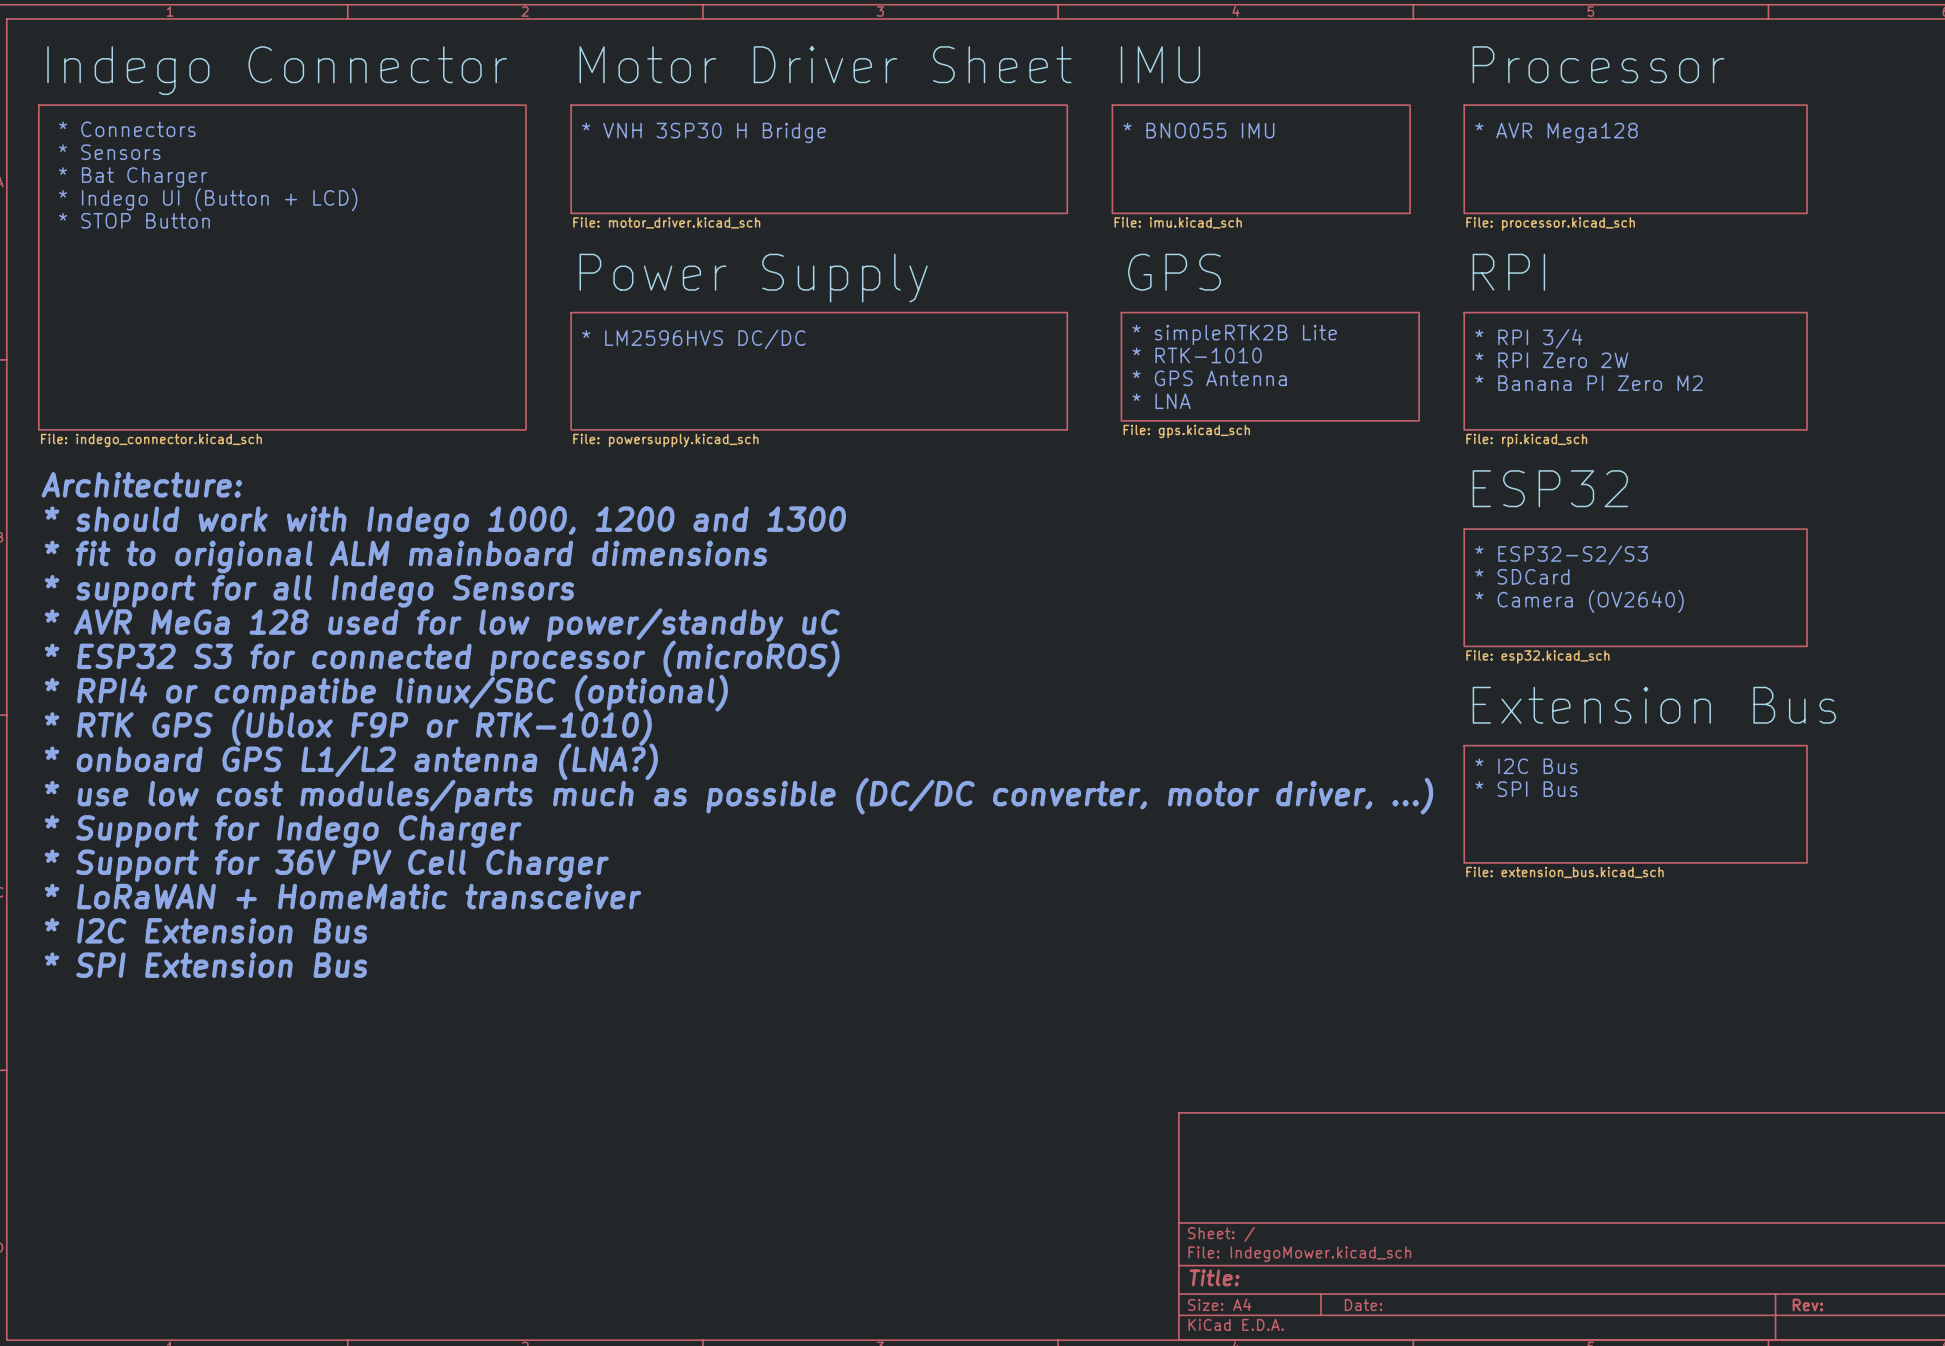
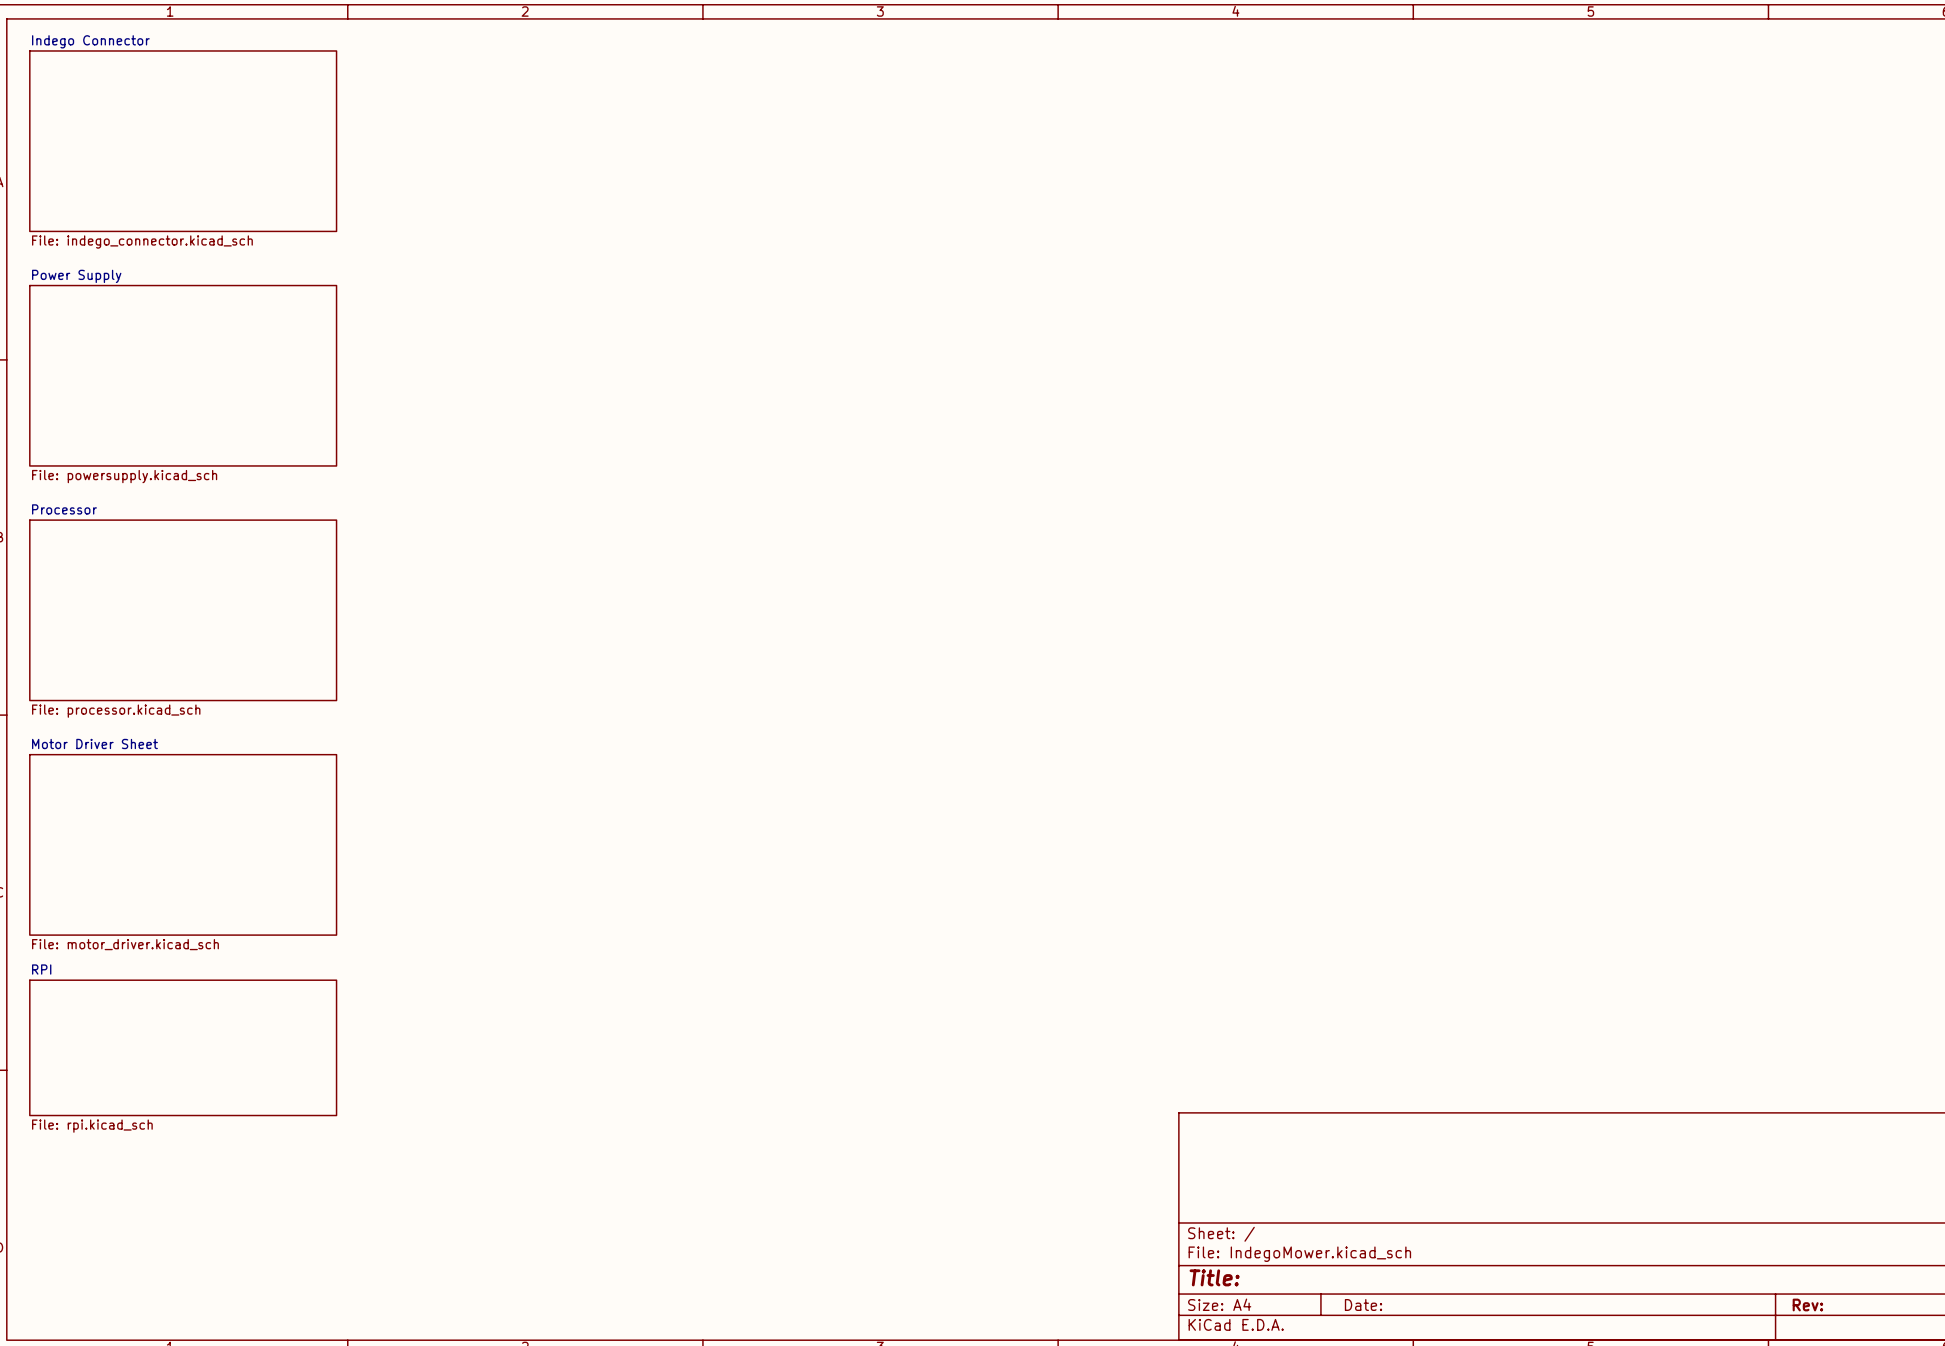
text: * Connectors (127, 129) -> none
text: * BNO055 IMU (1198, 130) -> none
text: * VNH 3SP30 H Bridge (703, 132) -> none
text: * AVR Mega128 (1556, 132) -> none
sheet Indego Connector: none -> File: indego_connector.kicad_sch (183, 141)
text: * Sensors (109, 152) -> none
sheet Motor Driver Sheet: File: motor_driver.kicad_sch (819, 159) -> none
sheet IMU: File: imu.kicad_sch (1261, 159) -> none
sheet Processor: File: processor.kicad_sch (1635, 159) -> none
text: * Bat Charger (133, 177) -> none
text: * Indego UI (Button + LCD) (208, 199) -> none
text: * STOP Button (134, 220) -> none
sheet Indego Connector: File: indego_connector.kicad_sch (282, 267) -> none
text: * simpleRTK2B Lite (1234, 334) -> none
text: * RPI 3/4 (1528, 338) -> none
text: * LM2596HVS DC/DC (693, 339) -> none
text: * RTK-1010 (1197, 355) -> none
text: * RPI Zero 2W (1551, 360) -> none
sheet GPS: File: gps.kicad_sch (1270, 366) -> none
sheet Power Supply: File: powersupply.kicad_sch (819, 371) -> none
sheet RPI: File: rpi.kicad_sch (1635, 371) -> none
sheet Power Supply: none -> File: powersupply.kicad_sch (183, 375)
text: * GPS Antenna (1209, 378) -> none
text: * Banana PI Zero M2 (1588, 383) -> none
text: * LNA (1161, 401) -> none
text: Architecture: (141, 484) -> none
text: * should work with Indego 1000, 1200 and 1300 (445, 522) -> none
text: * ESP32-S2/S3 (1561, 555) -> none
text: * fit to origional ALM mainboard dimensions (405, 556) -> none
text: * SDCard (1522, 576) -> none
sheet ESP32: File: esp32.kicad_sch (1635, 587) -> none
text: * support for all Indego Sensors (309, 591) -> none
text: * Camera (OV2640) (1579, 601) -> none
sheet Processor: none -> File: processor.kicad_sch (183, 610)
text: * AVR MeGa 128 used for low power/standby uC (442, 625) -> none
text: * ESP32 S3 for connected processor (microROS) (442, 658) -> none
text: * RPI4 or compatibe linux/SBC (optional) (386, 693) -> none
text: * RTK GPS (Ublox F9P or RTK-1010) (348, 727) -> none
text: * onboard GPS L1/L2 antenna (LNA?) (351, 761) -> none
text: * I2C Bus (1526, 766) -> none
text: * SPI Bus (1526, 789) -> none
text: * use low cost modules/parts much as possible (DC/DC converter, motor driver, ...) (739, 796) -> none
sheet Extension Bus: File: extension_bus.kicad_sch (1635, 804) -> none
text: * Support for Indego Charger (283, 831) -> none
sheet Motor Driver Sheet: none -> File: motor_driver.kicad_sch (183, 844)
text: * Support for 36V PV Cell Charger (326, 865) -> none
text: * LoRaWAN + HomeMatic transceiver (343, 896) -> none
text: * I2C Extension Bus (205, 930) -> none
text: * SPI Extension Bus (205, 965) -> none
sheet RPI: none -> File: rpi.kicad_sch (183, 1047)

